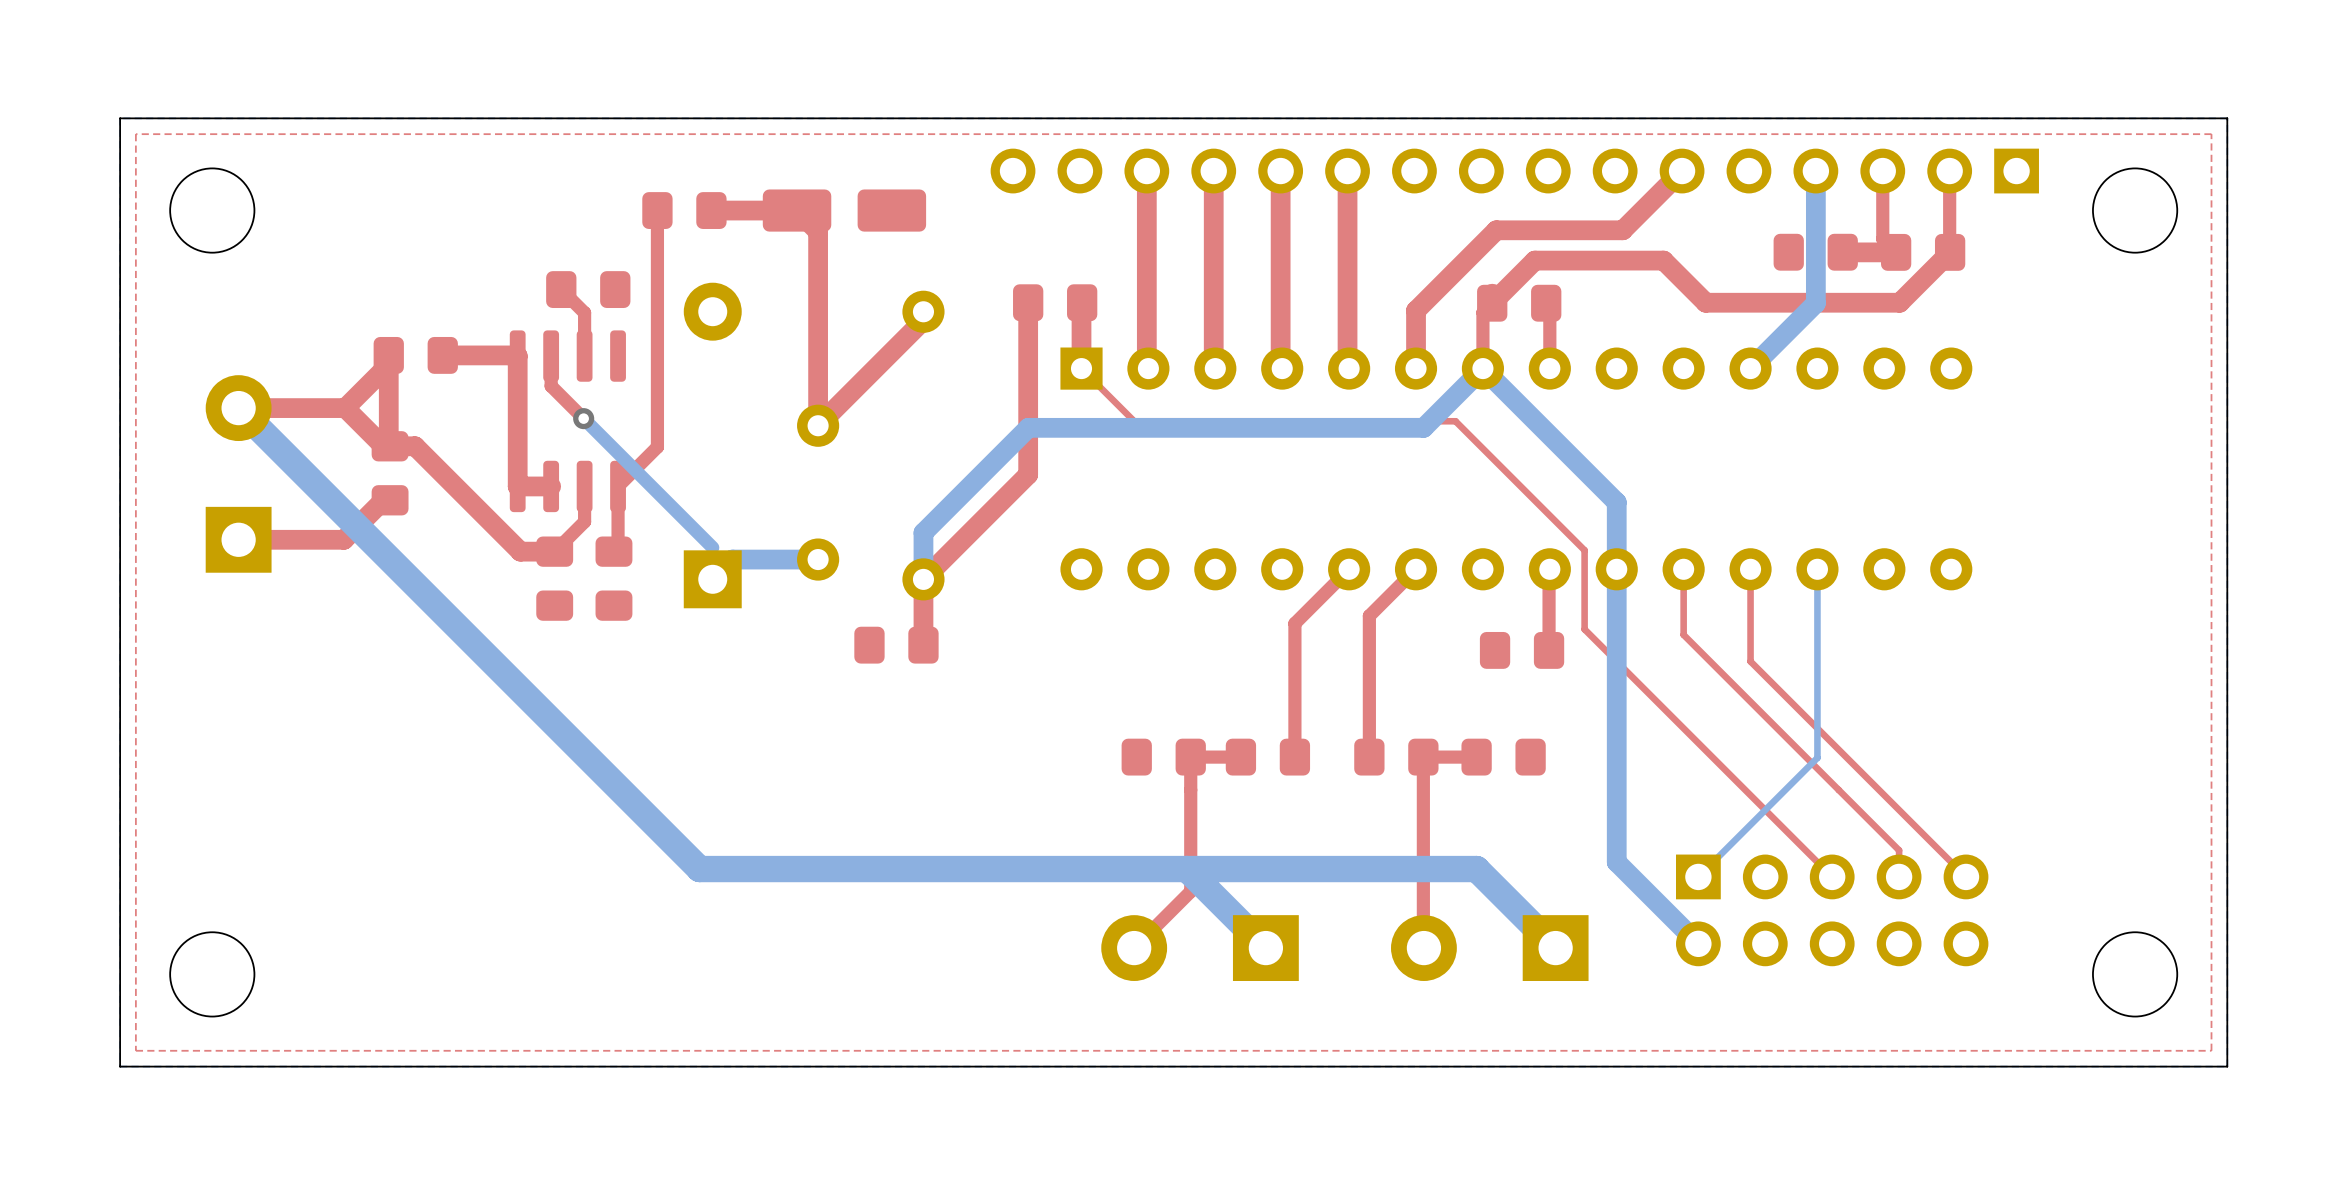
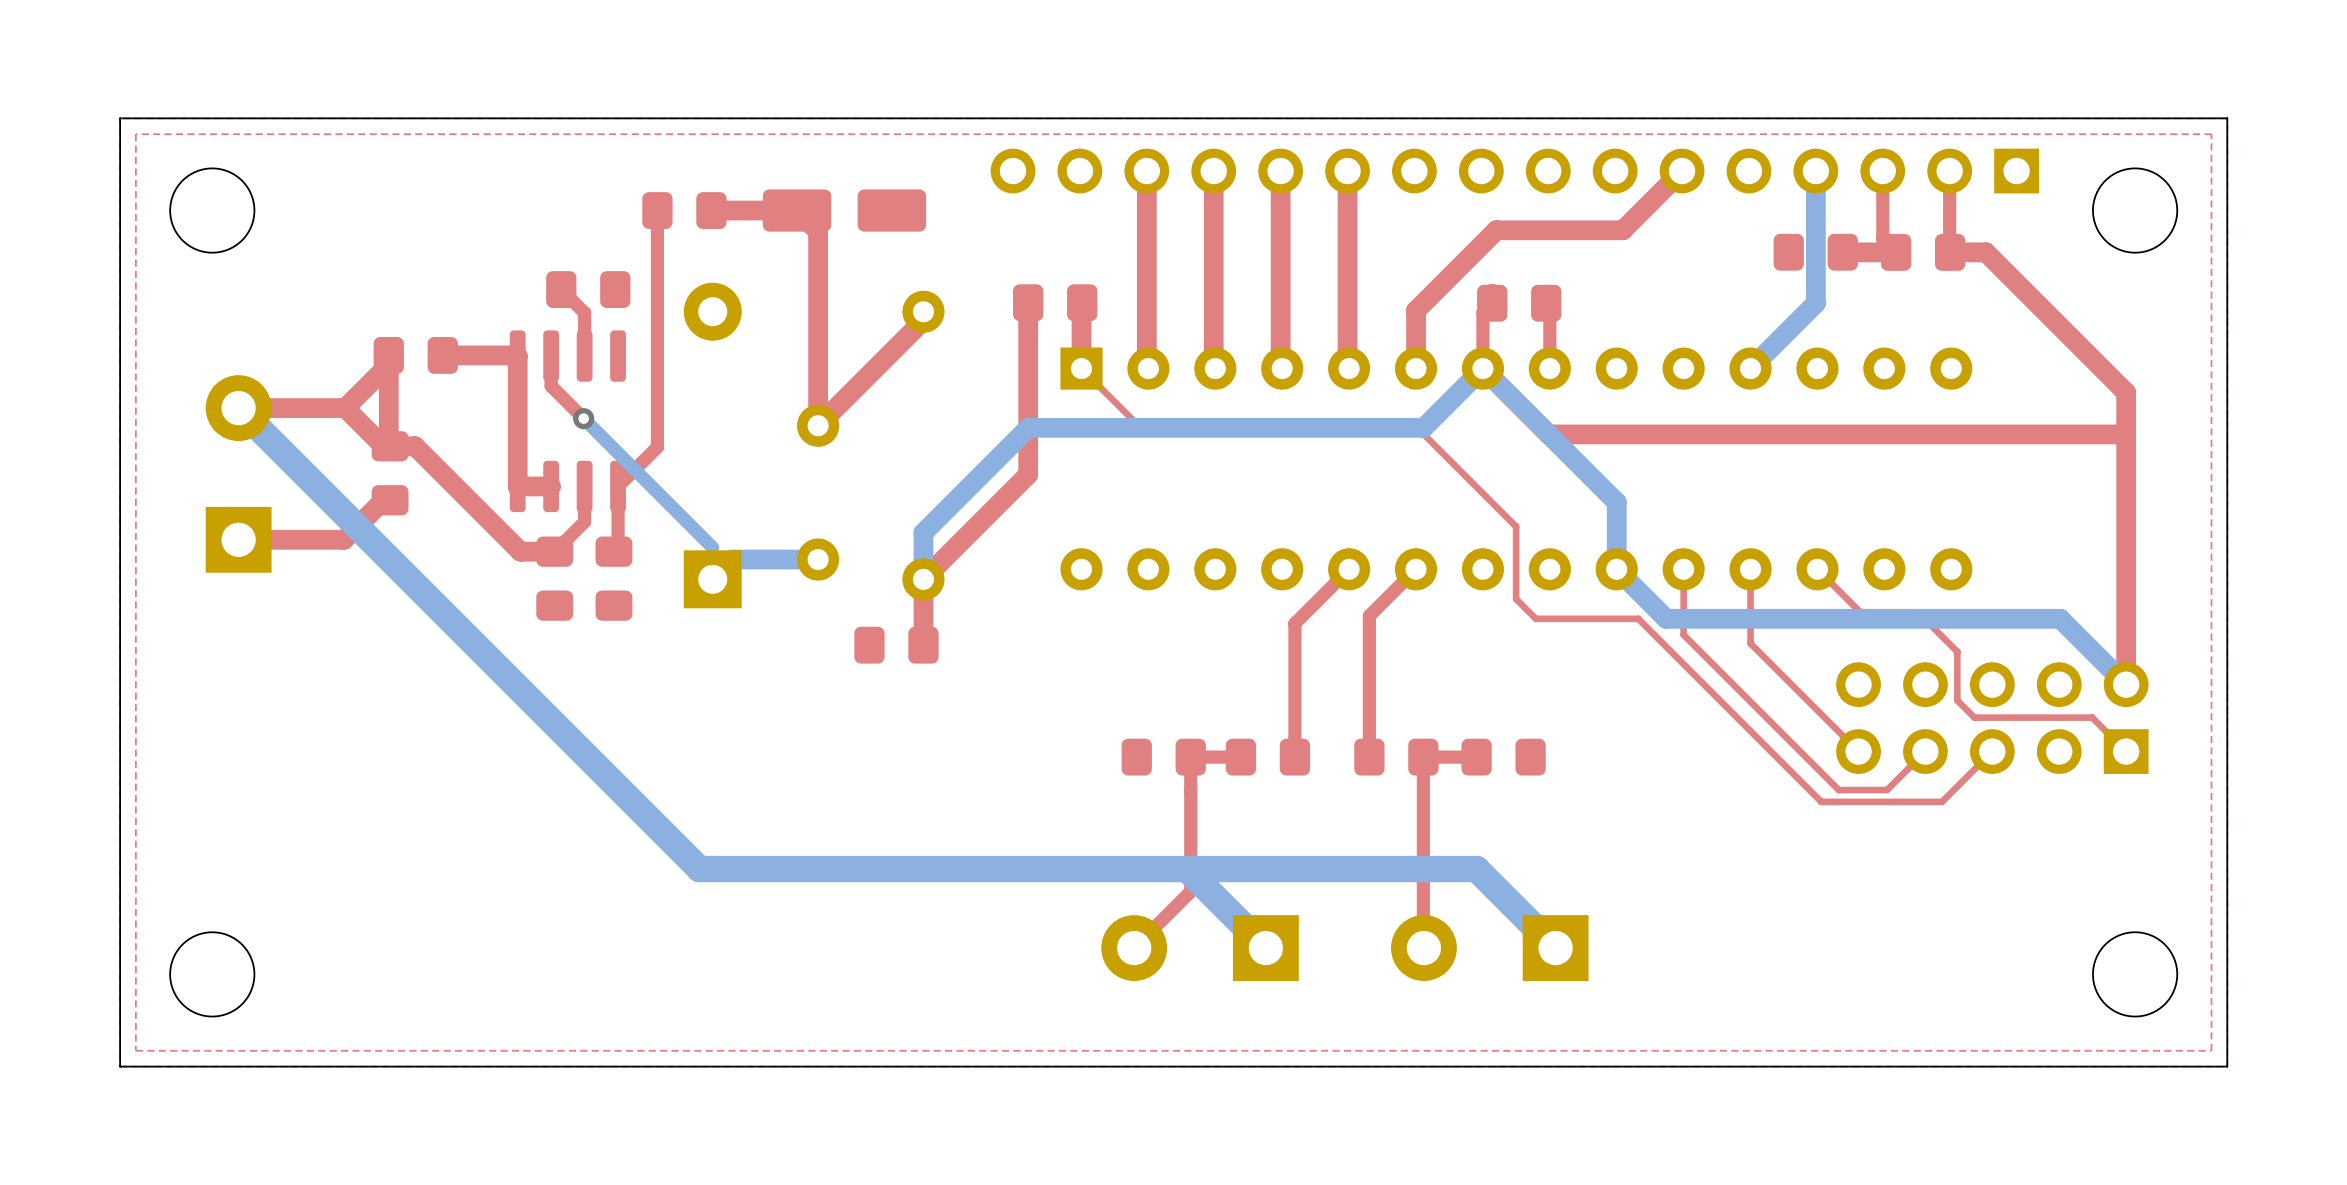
top track: (1950, 252) (1899, 302) (1705, 302) (1663, 260) (1534, 260) (1492, 303) -> (1950, 252) (1985, 252) (2126, 392) (2126, 684)
top track: none -> (1482, 368) (1548, 434) (2126, 434)
top track: (1410, 421) (1455, 421) (1584, 550) (1584, 629) (1832, 876) -> (1410, 421) (1516, 526) (1516, 599) (1535, 618) (1638, 618) (1821, 801) (1942, 801) (1992, 751)
top track: (1549, 569) (1549, 650) -> none
bottom track: (1616, 569) (1616, 862) (1698, 943) -> (1616, 569) (1666, 618) (2060, 618) (2126, 684)
top track: none -> (1817, 569) (1860, 612) (1917, 612) (1957, 651) (1957, 700) (1974, 717) (2092, 717) (2126, 751)
bottom track: (1817, 569) (1817, 757) (1698, 876) -> none
top track: (1750, 643) (1750, 661) (1966, 876) -> (1750, 643) (1858, 751)
part: (1522, 650) -> none
top track: (1838, 790) (1899, 850) (1899, 876) -> (1838, 790) (1886, 790) (1925, 751)
part rotation: 0° (1832, 910) -> 180° (1992, 718)
part position: (1832, 910) -> (1992, 718)

